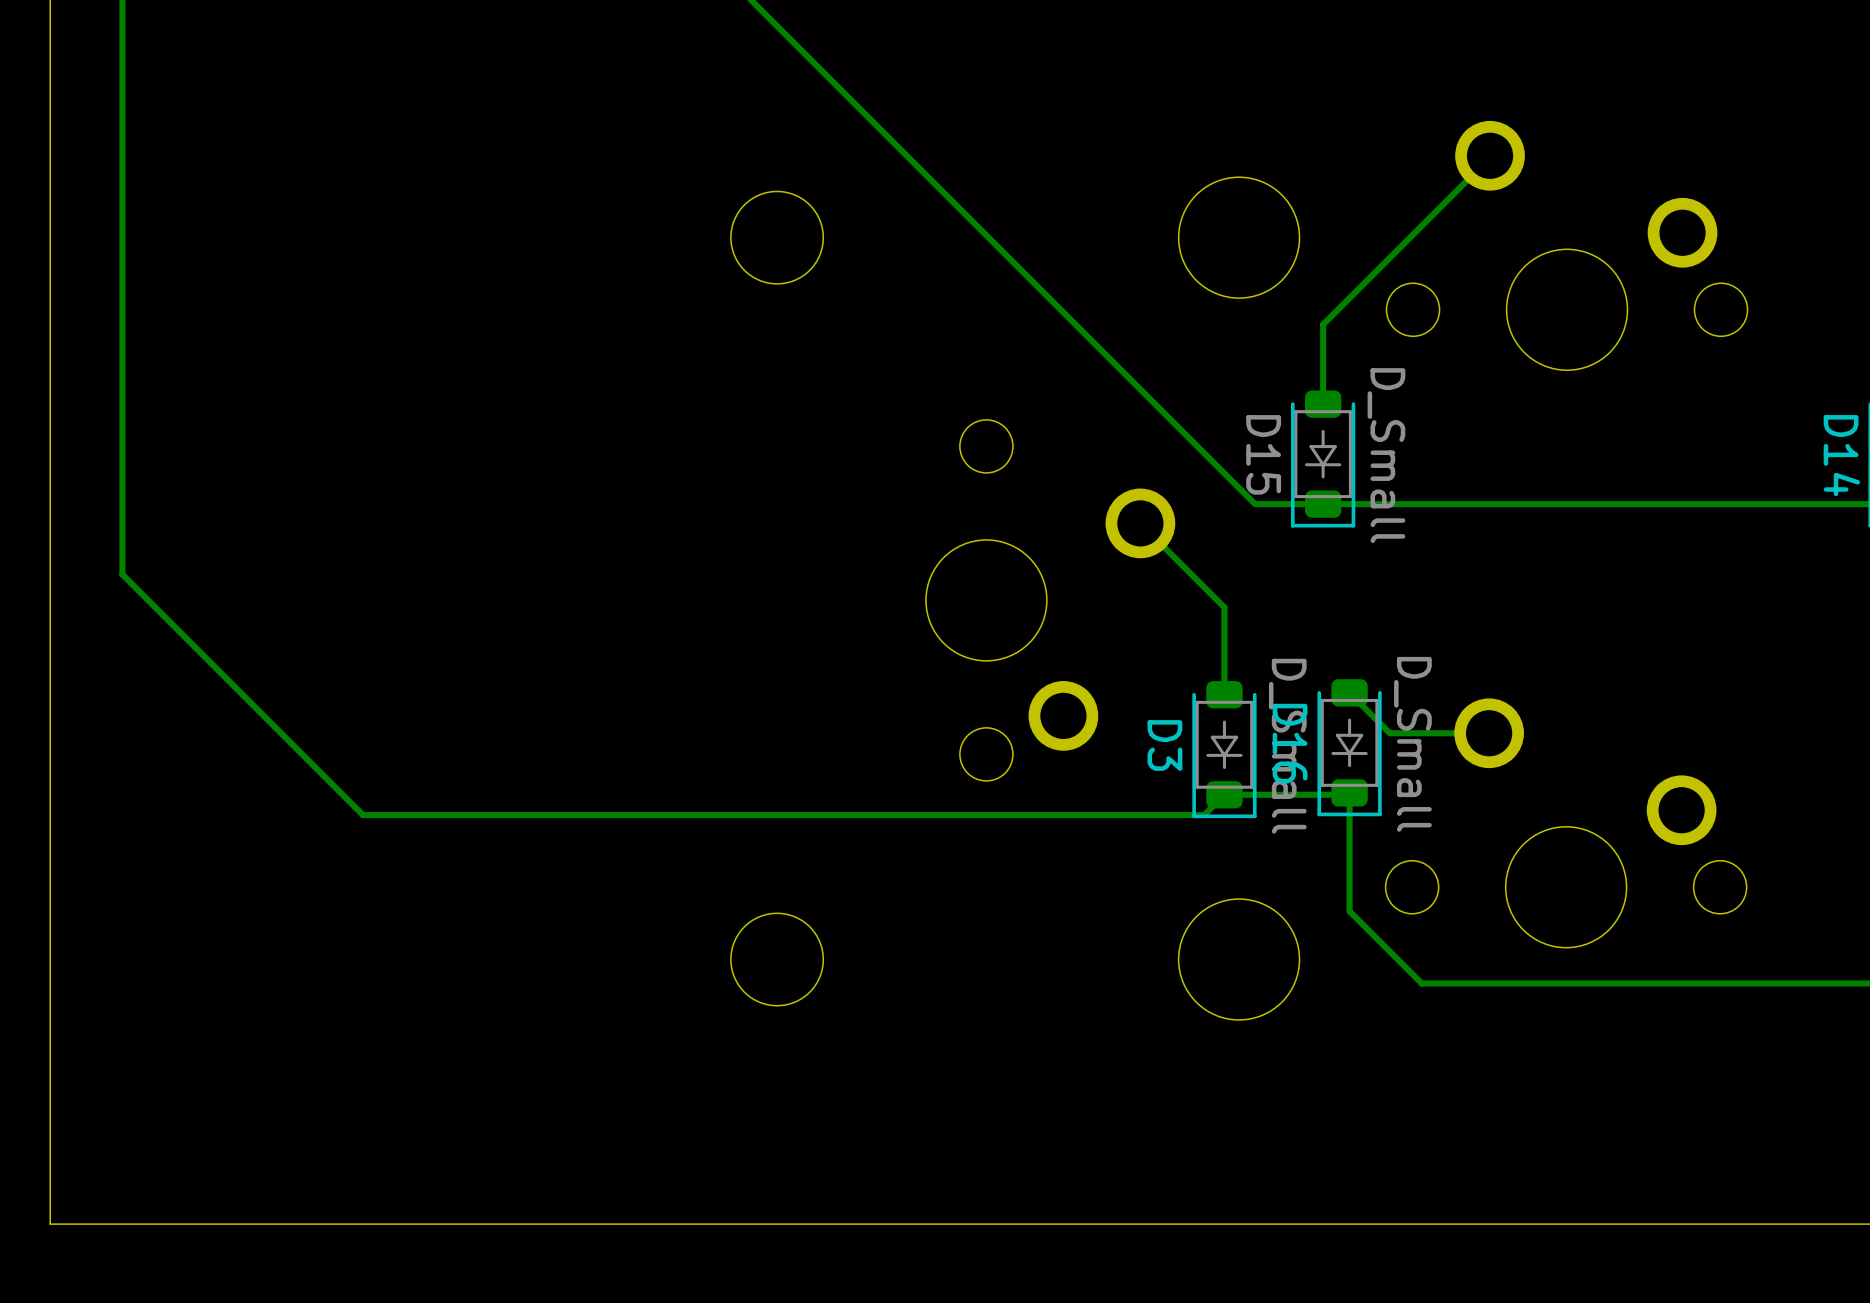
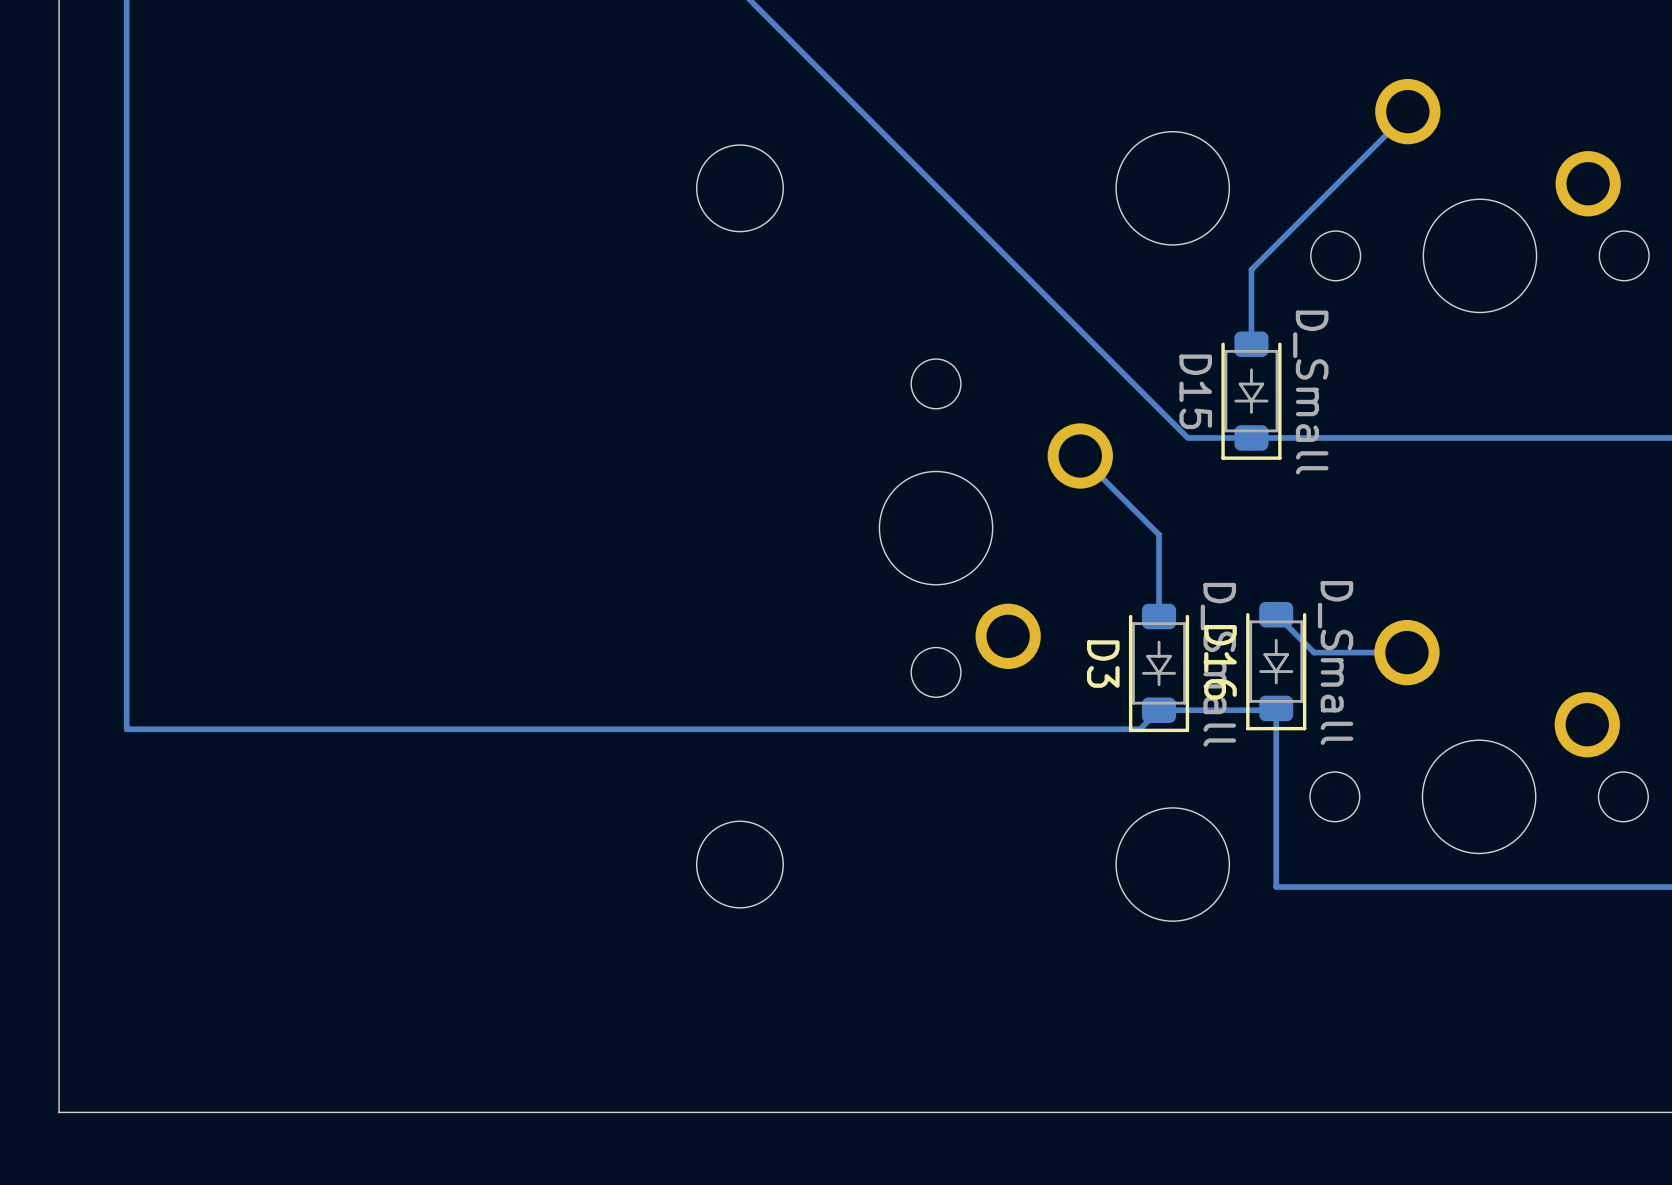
track: (122, 574) (363, 815) -> (126, 503) (126, 729) (352, 729)
track: (1349, 911) (1421, 983) -> (1276, 819) (1276, 887) (1343, 887)

